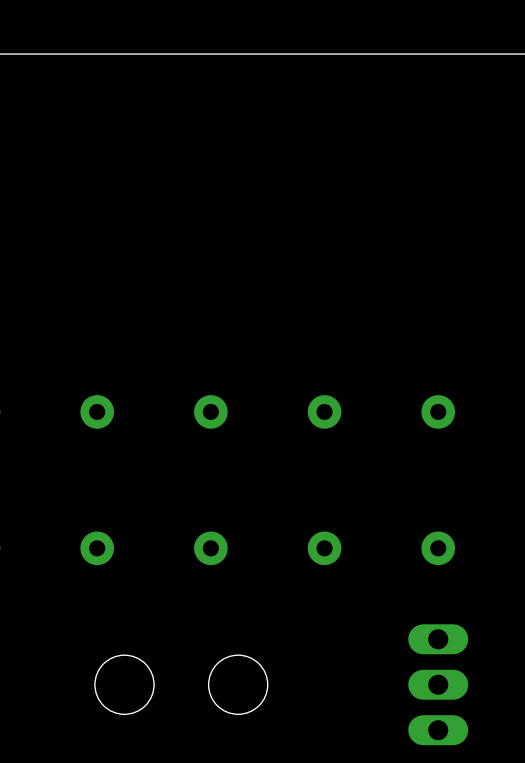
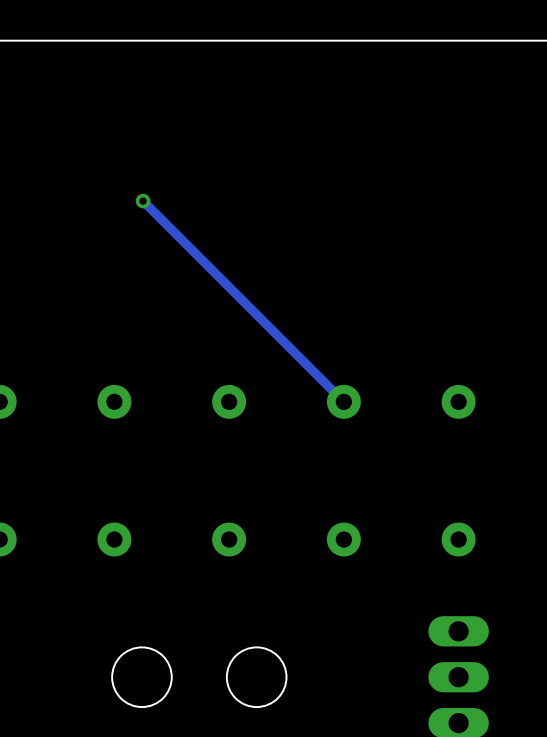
track: none -> (143, 201) (343, 401)
via: none -> (143, 201)

